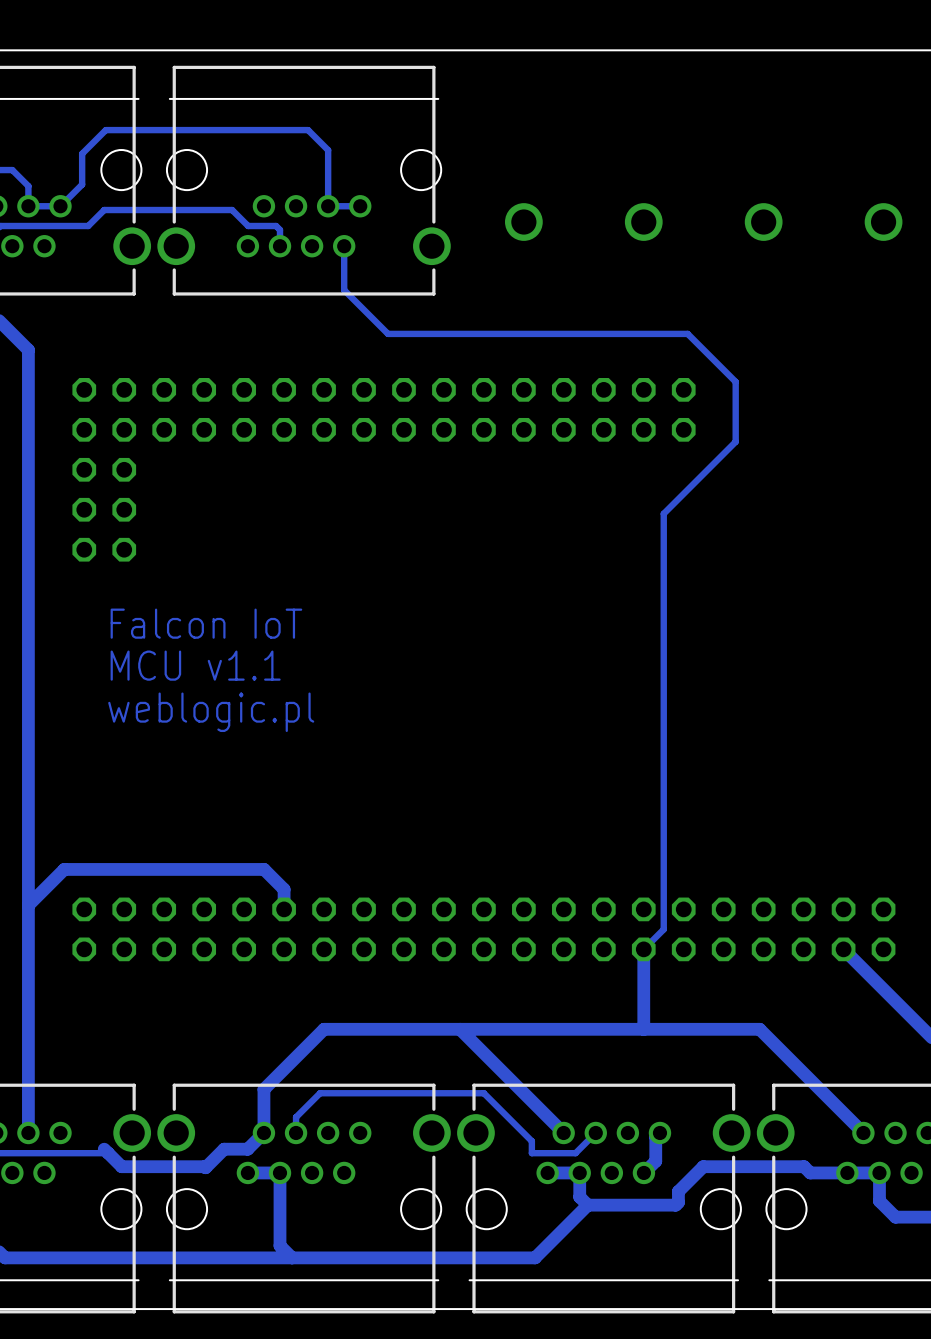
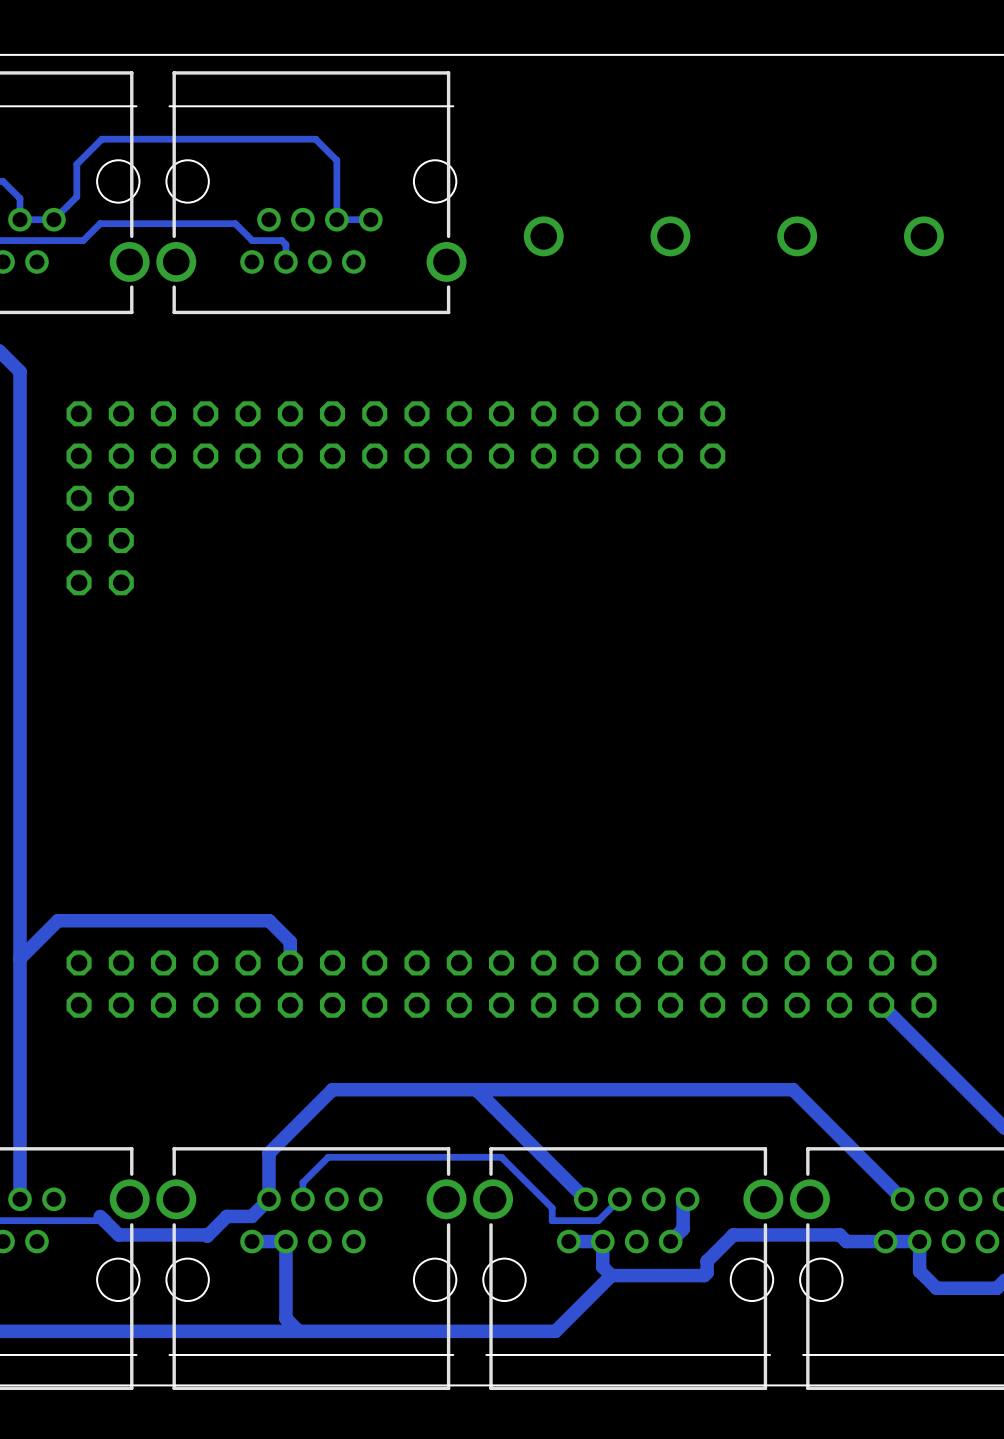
track: (344, 246) (344, 290) (388, 333) (687, 333) (735, 381) (735, 441) (663, 513) (663, 929) (643, 949) (643, 1029) -> none
text: Falcon IoT (206, 623) -> none
text: MCU v1.1 (195, 665) -> none
text: weblogic.pl (211, 712) -> none

